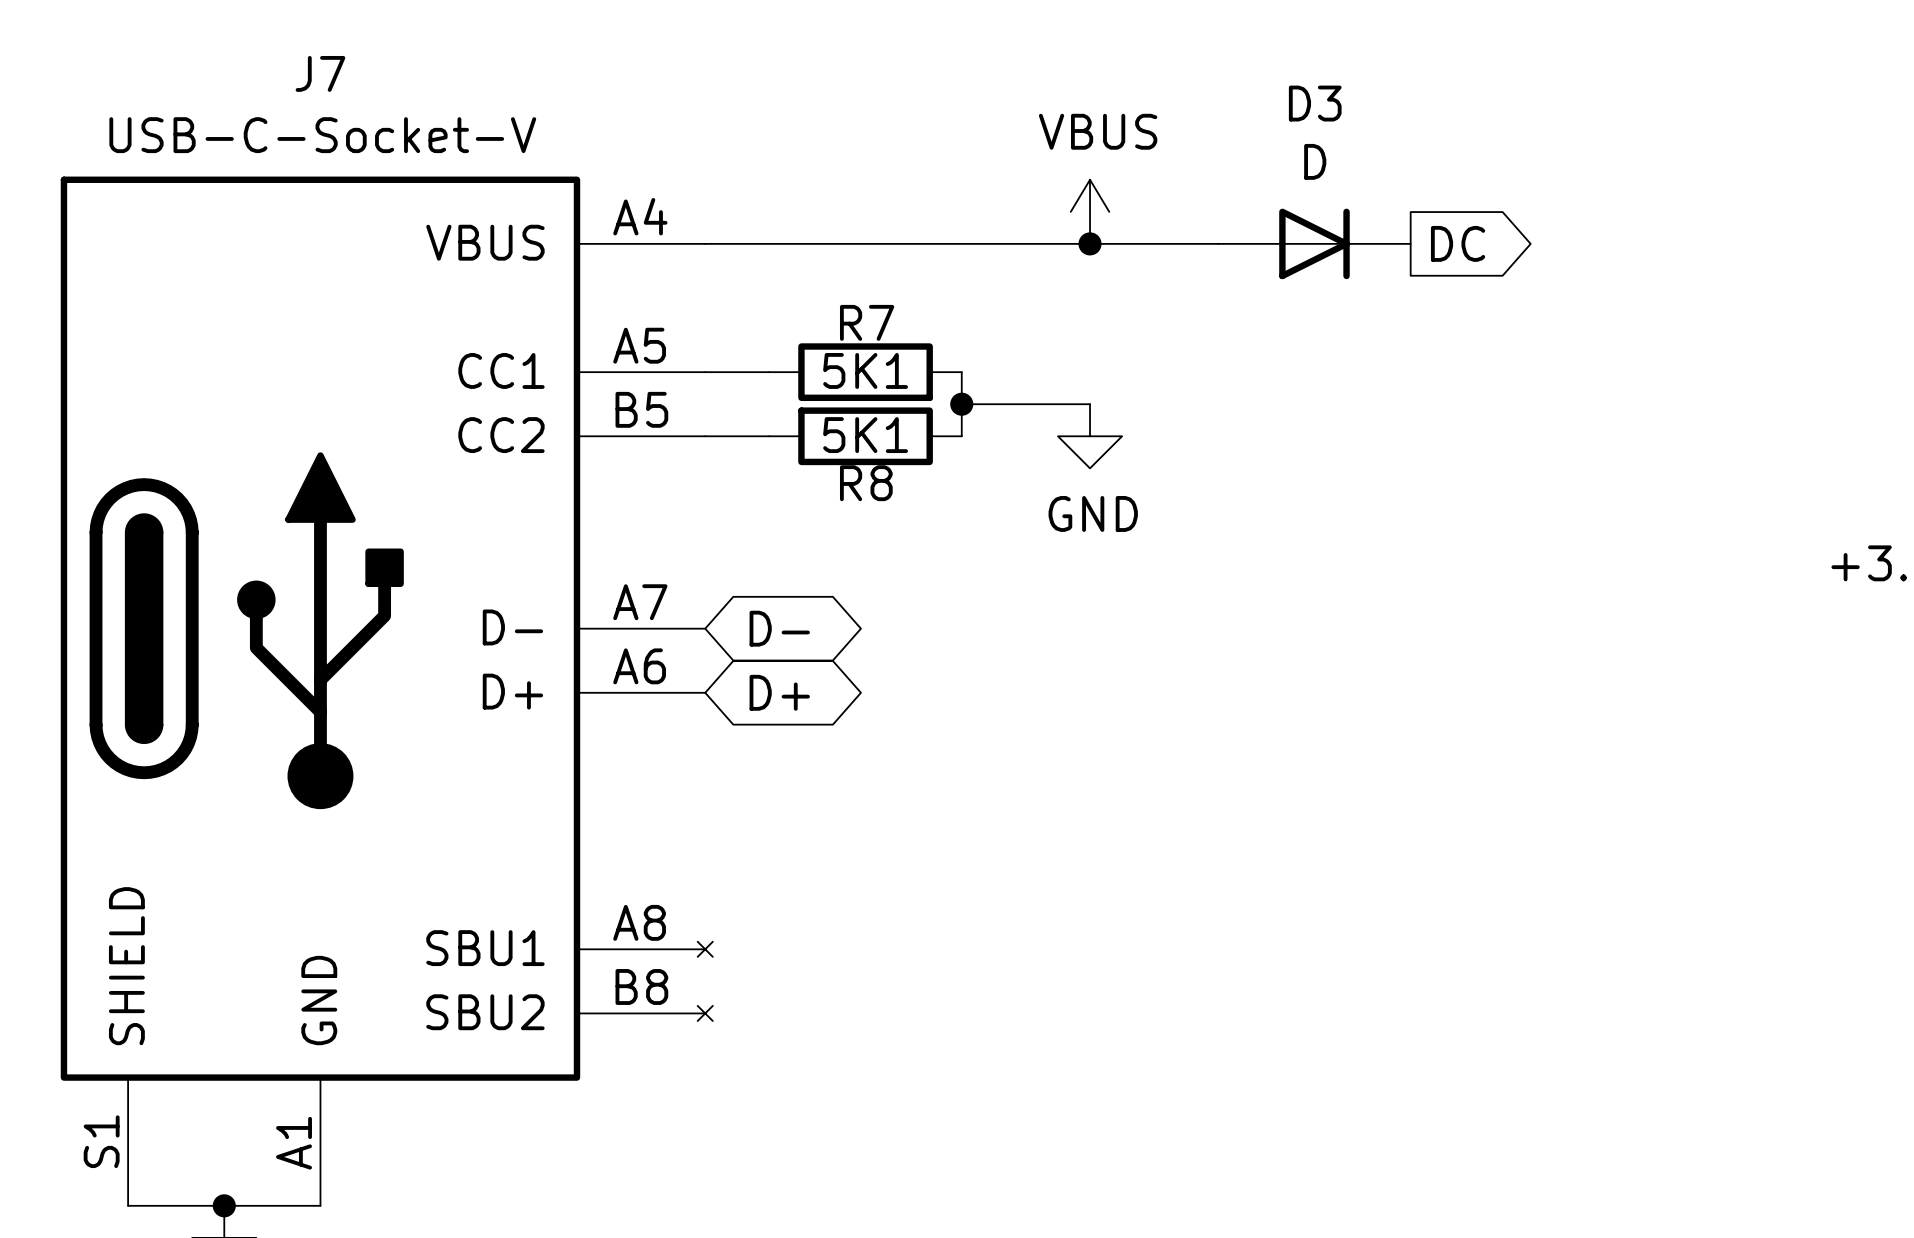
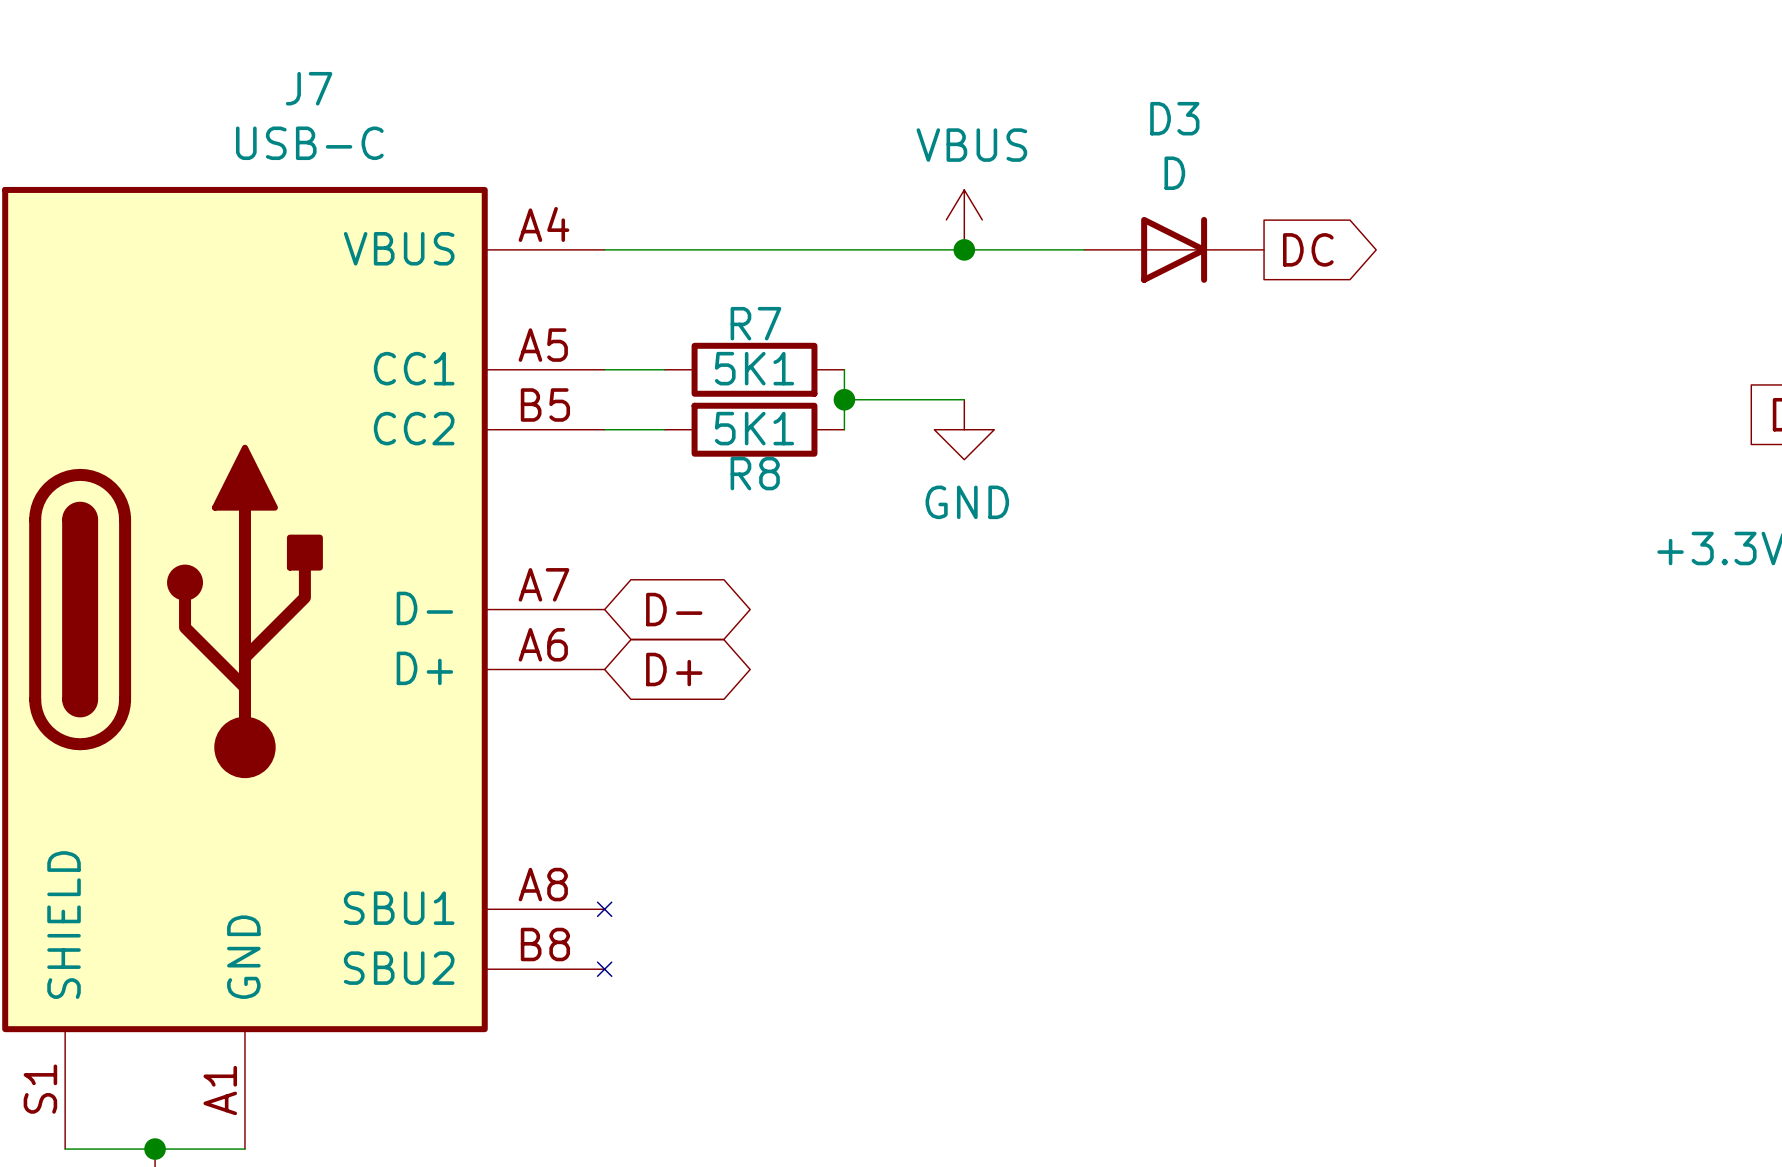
J7 name position: J7 (320, 73) -> J7 (309, 88)
J7 value: USB-C-Socket-V (322, 135) -> USB-C (309, 143)

